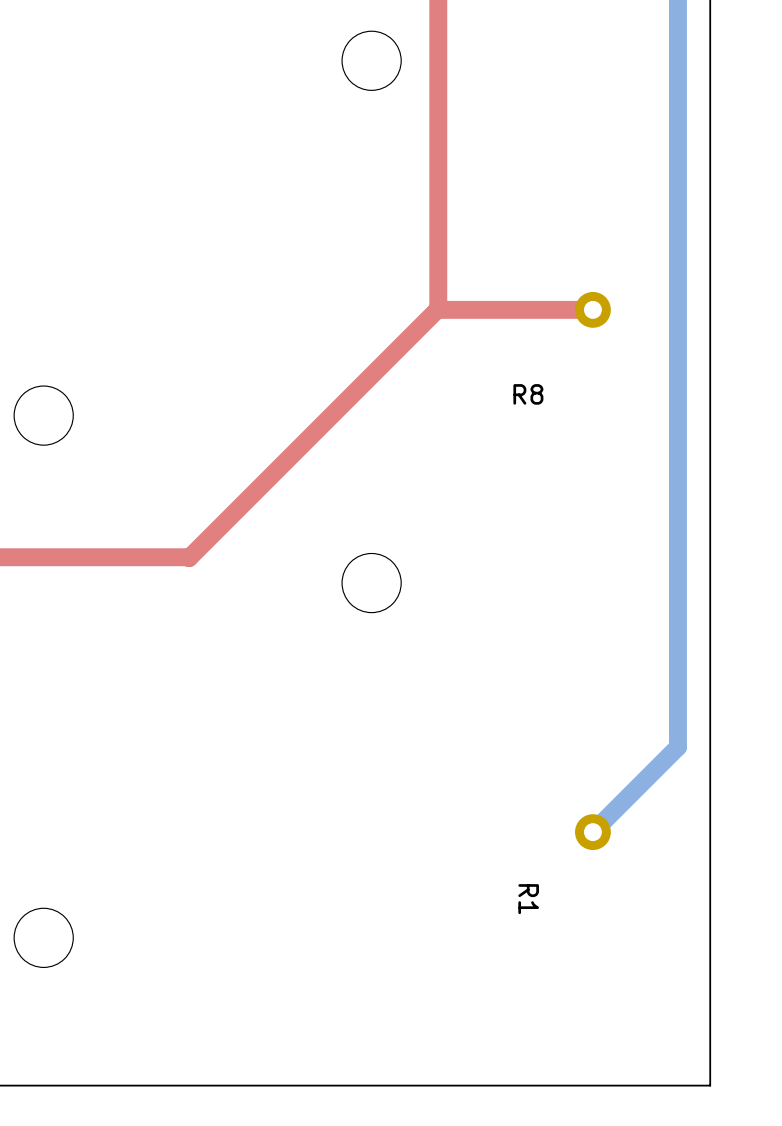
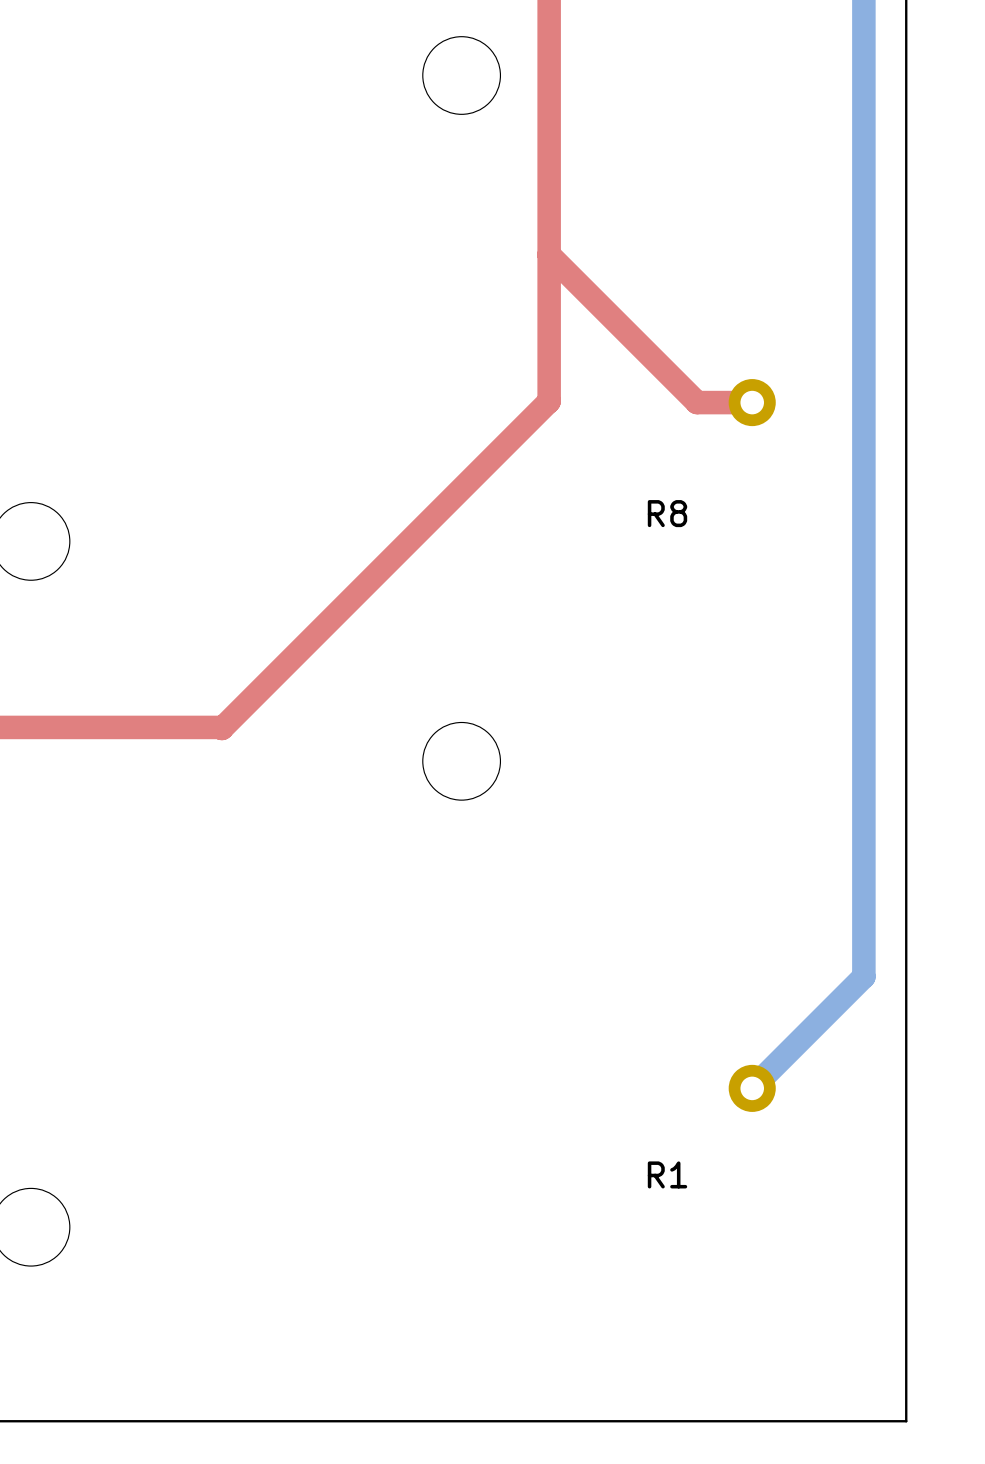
top track: (437, 309) (550, 309) -> (549, 254) (697, 402)
R1 name rotation: 0° (528, 899) -> 90° counterclockwise (667, 1174)

